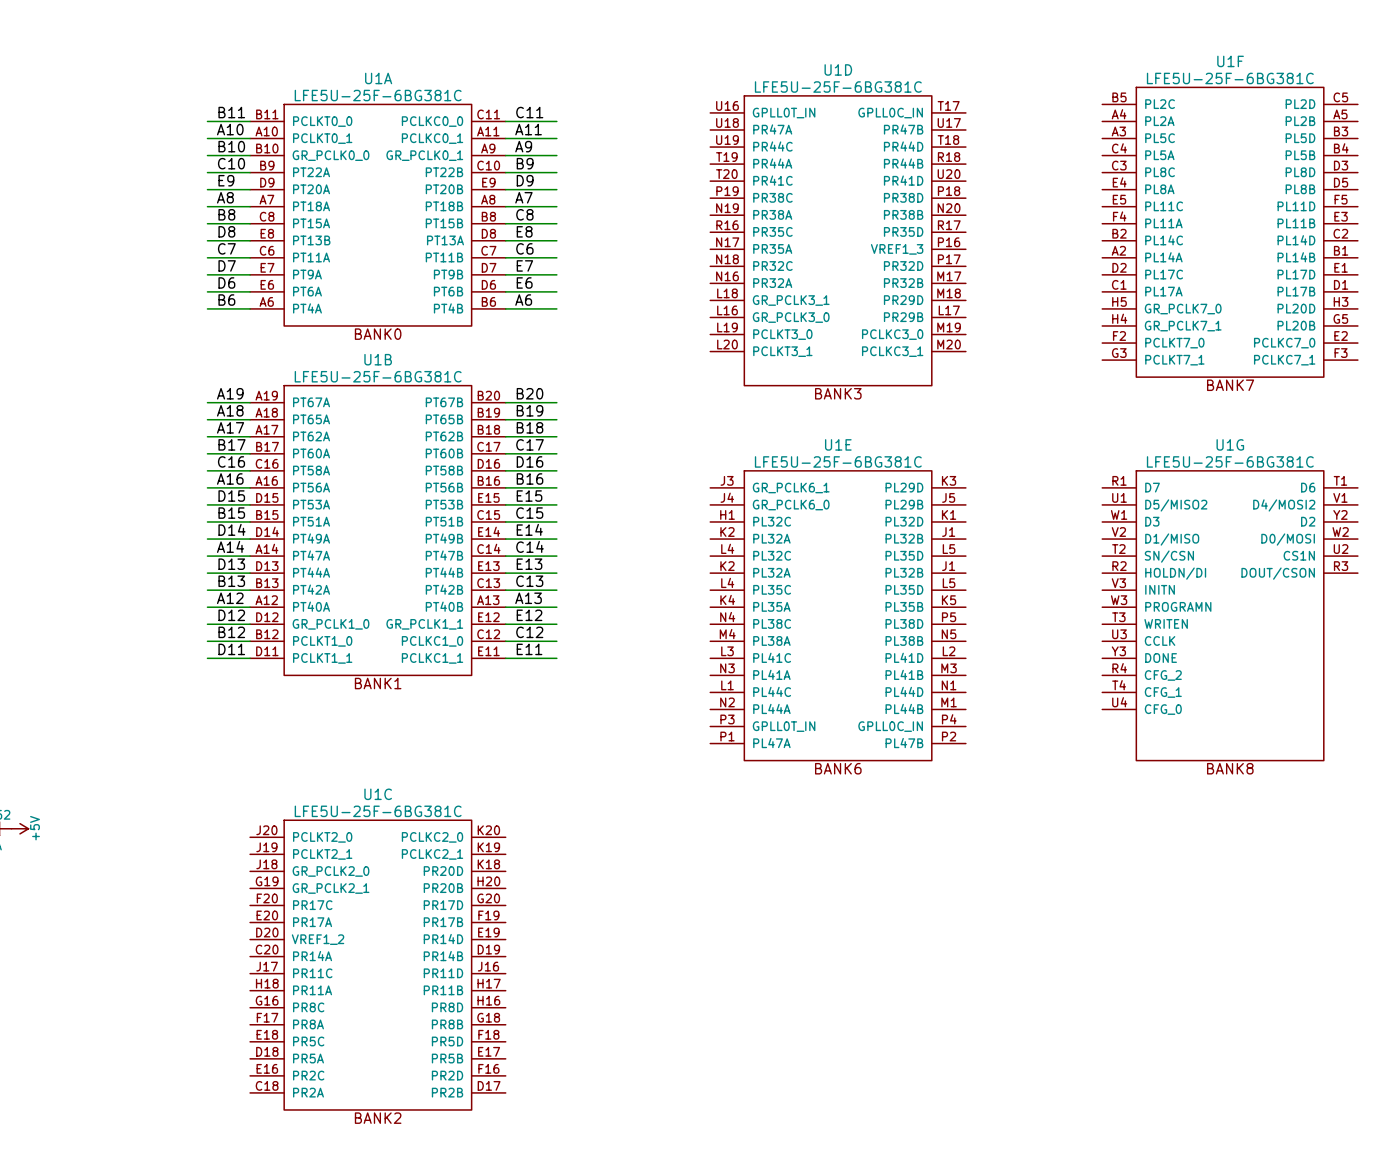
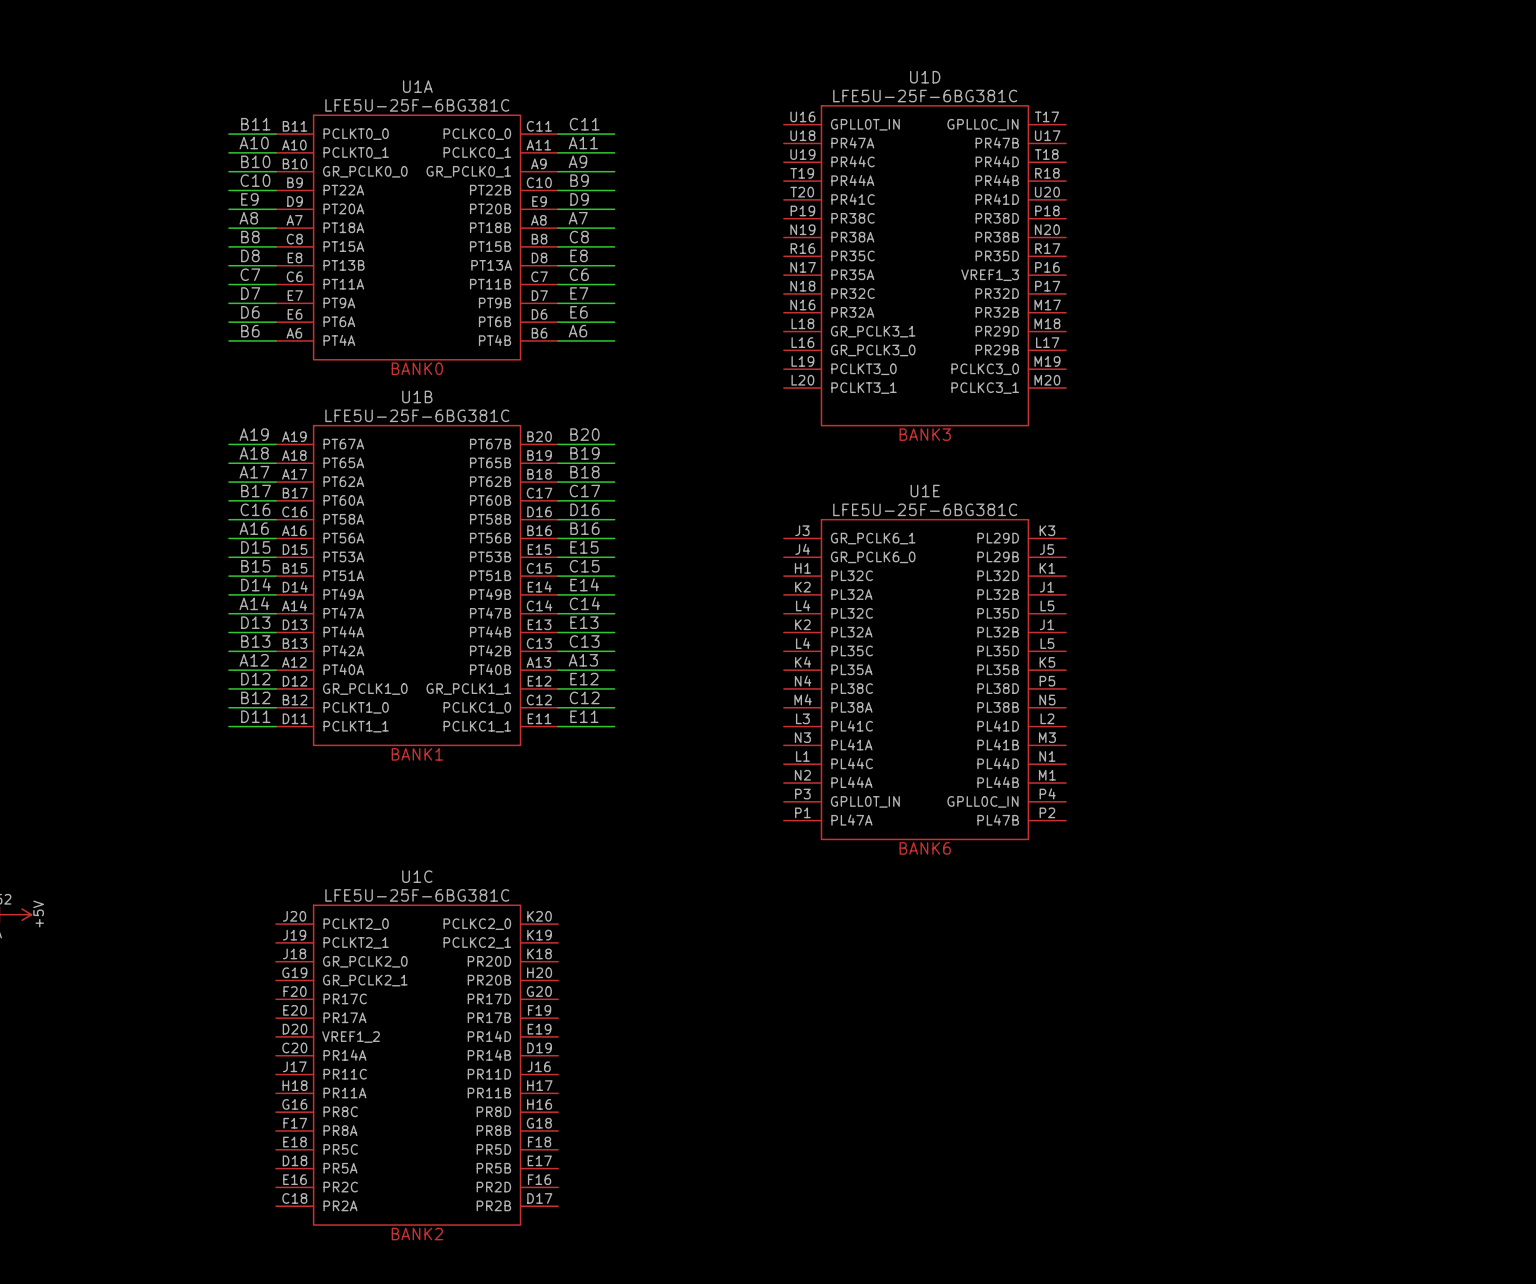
U1F: LFE5U-25F-6BG381C (1230, 232) -> none
U1G: LFE5U-25F-6BG381C (1230, 615) -> none

